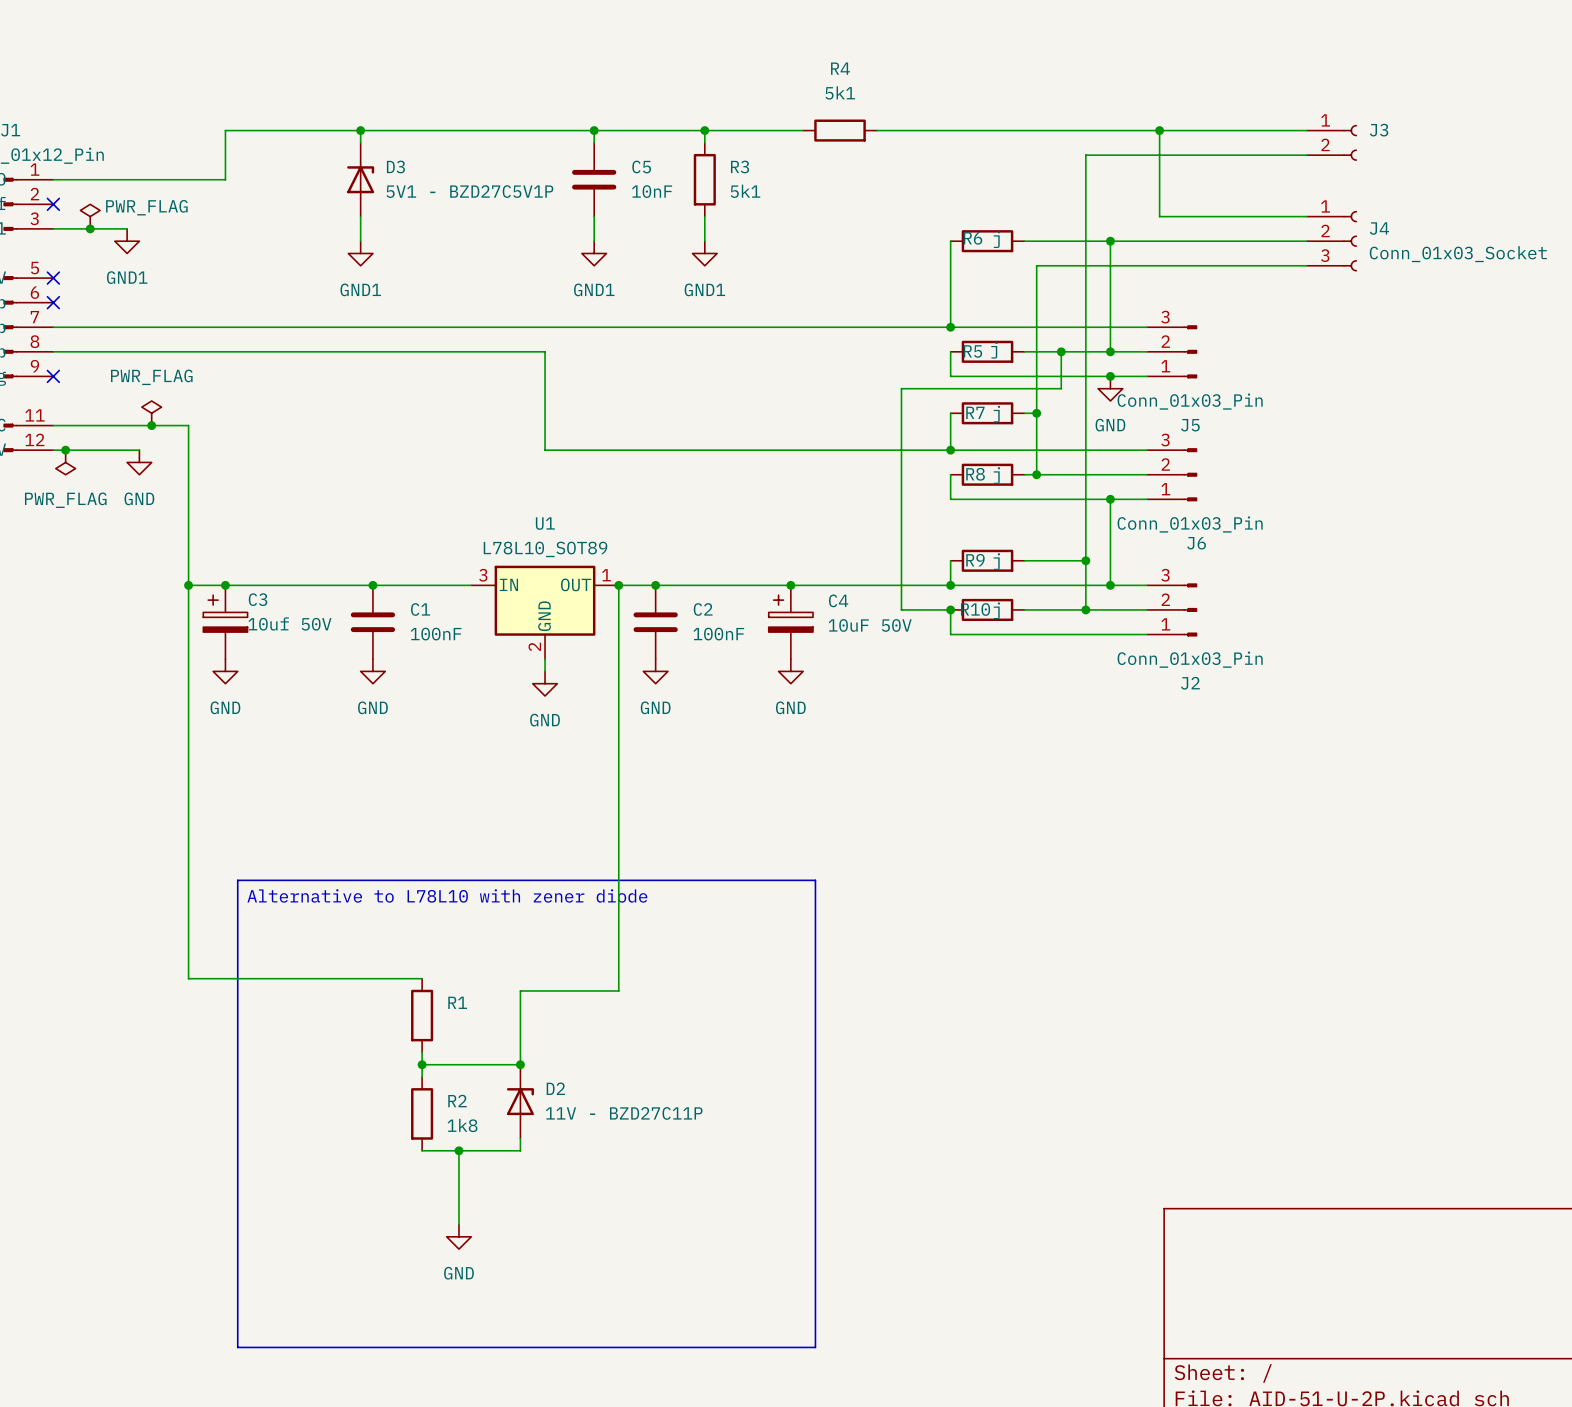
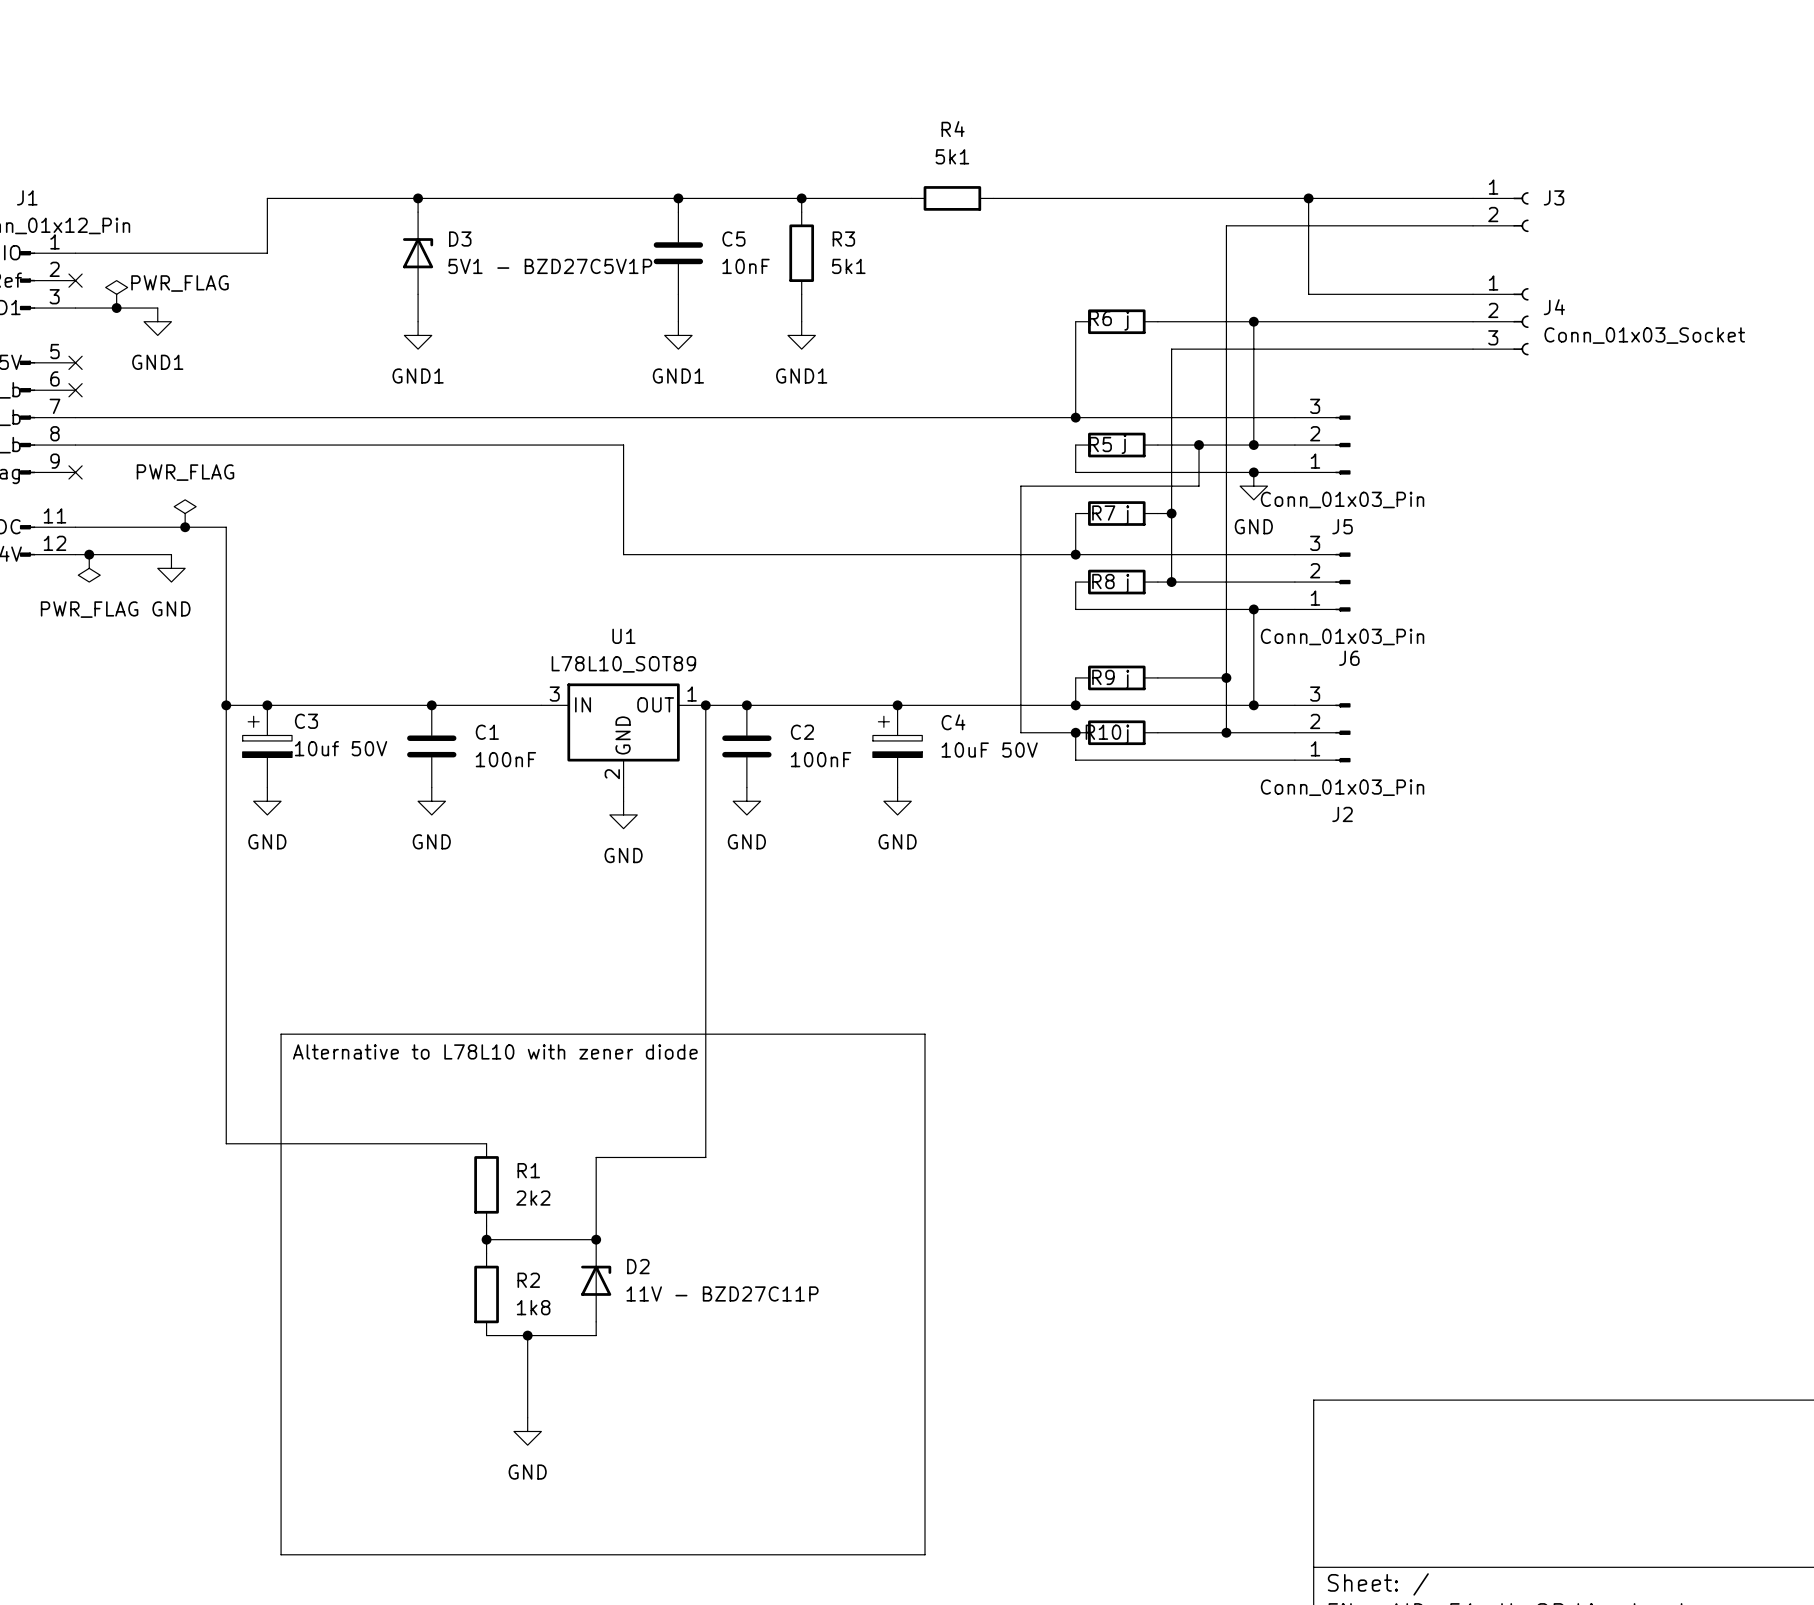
R1 value: none -> 2k2 (533, 1198)

